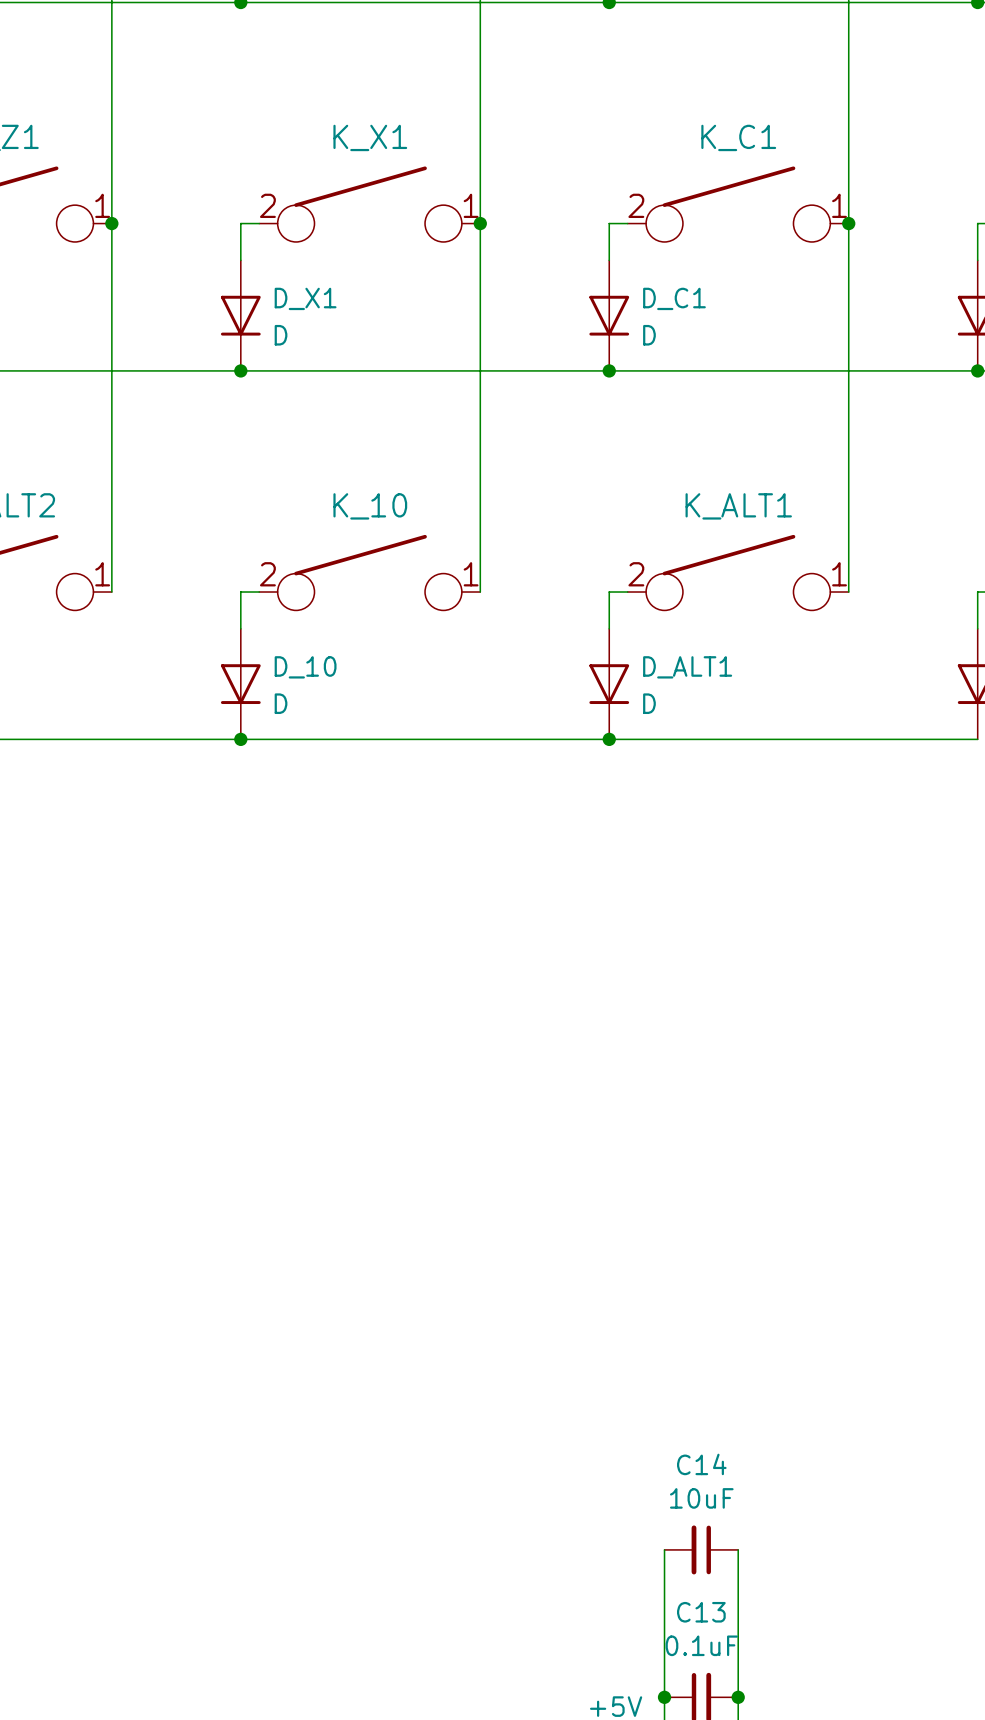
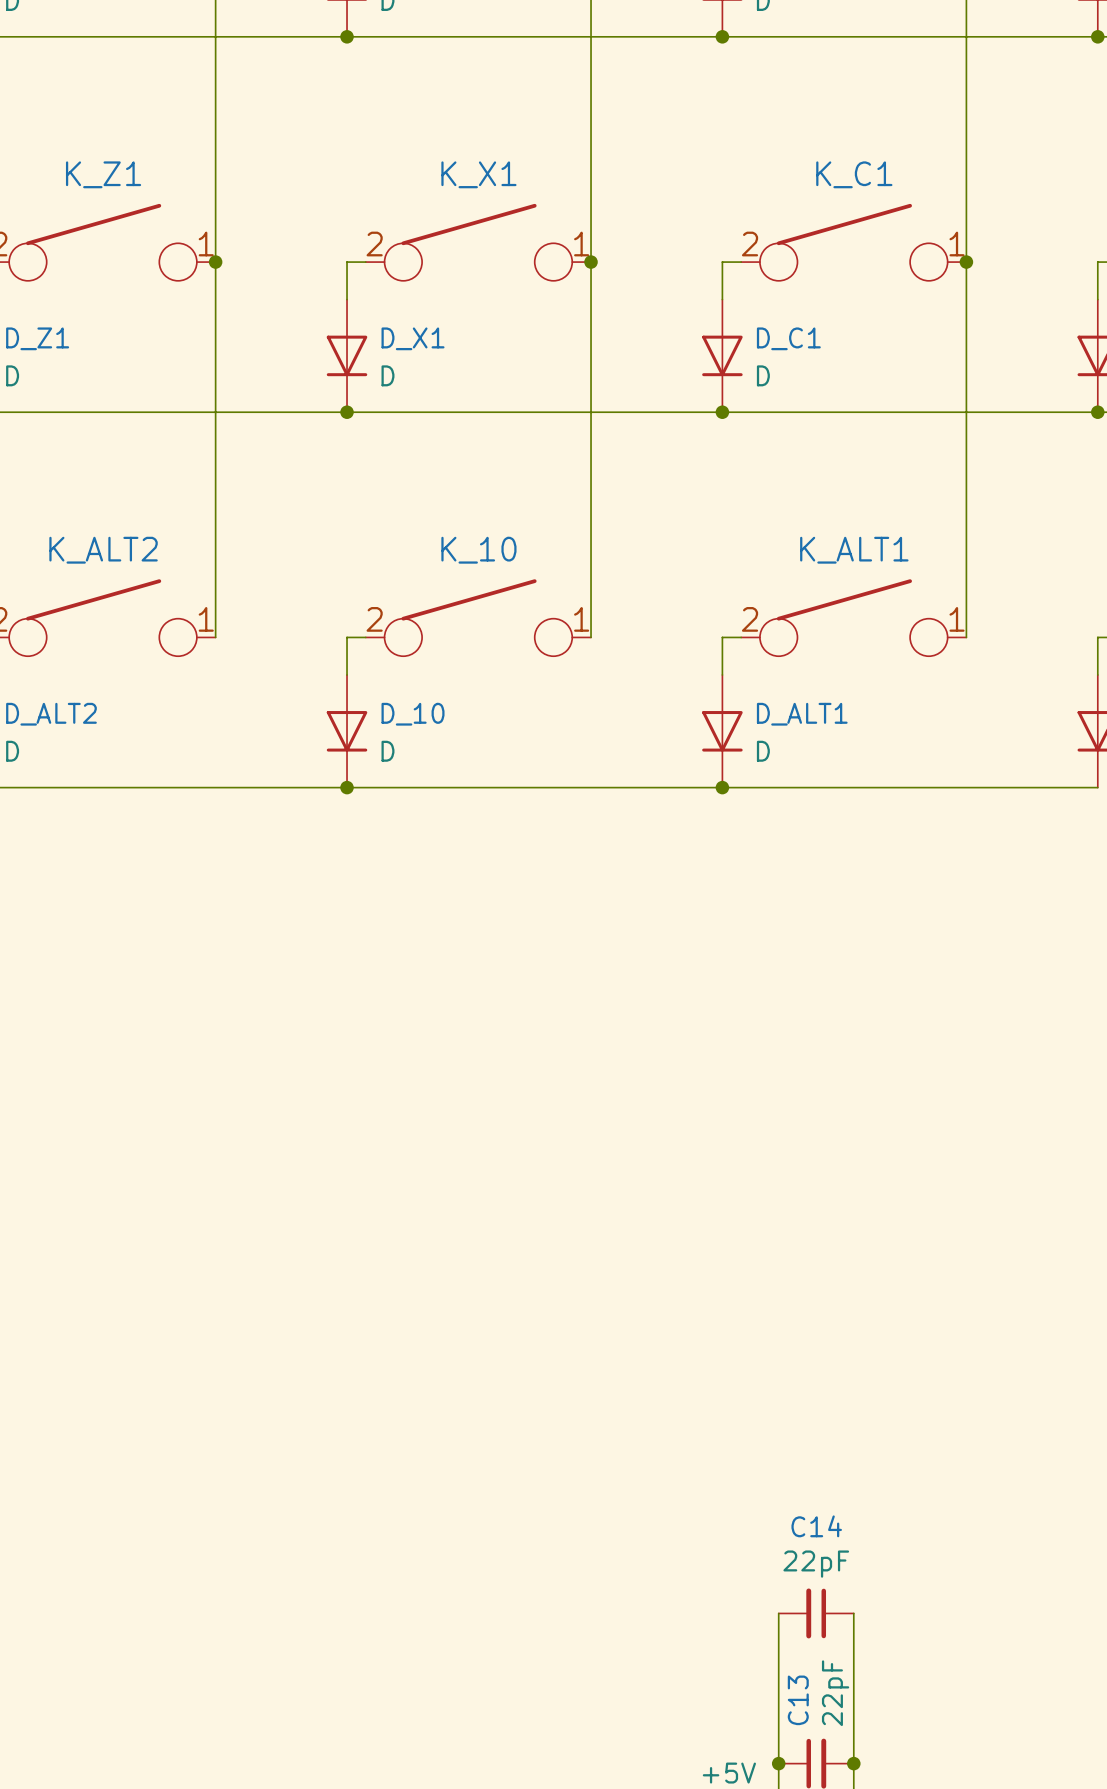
C14 value: 10uF (701, 1498) -> 22pF (816, 1564)
C13 name rotation: 0° (701, 1612) -> 90° counterclockwise (798, 1700)
C13 value: 0.1uF (701, 1645) -> 22pF (835, 1693)

